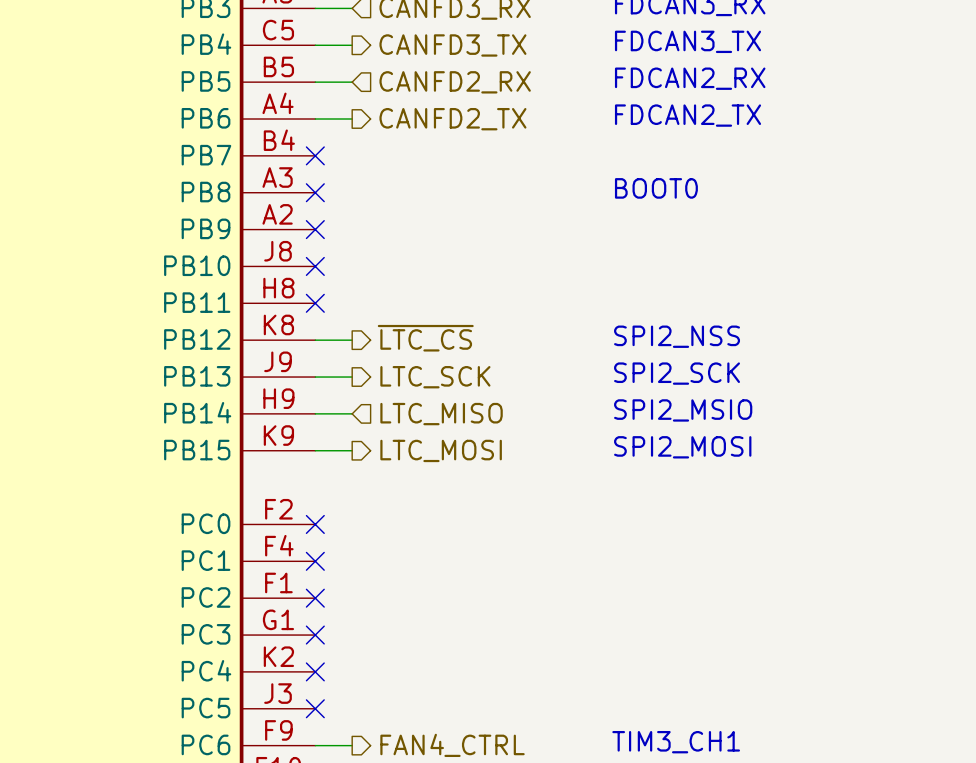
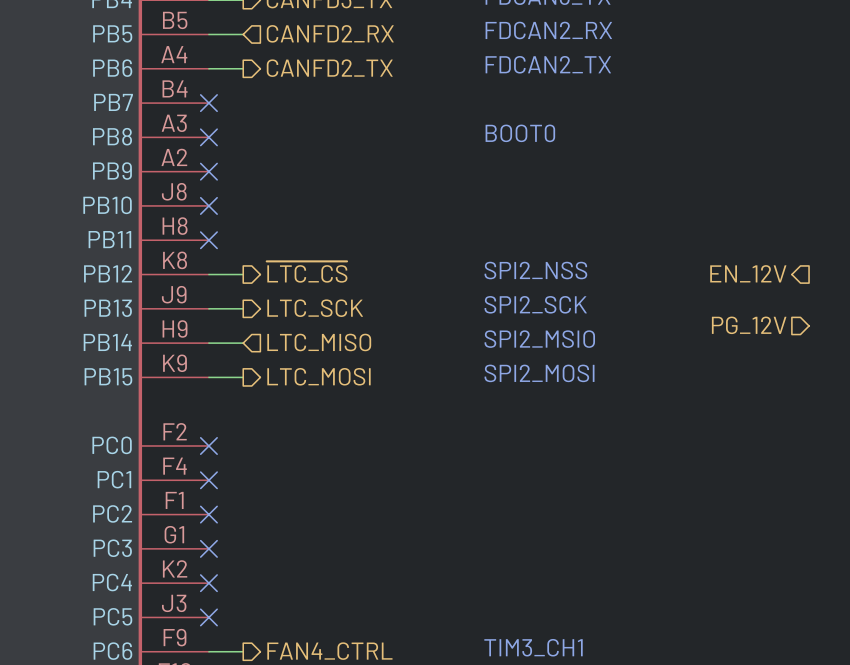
hierarchical label: none -> EN_12V (748, 273)
hierarchical label: none -> PG_12V (749, 325)

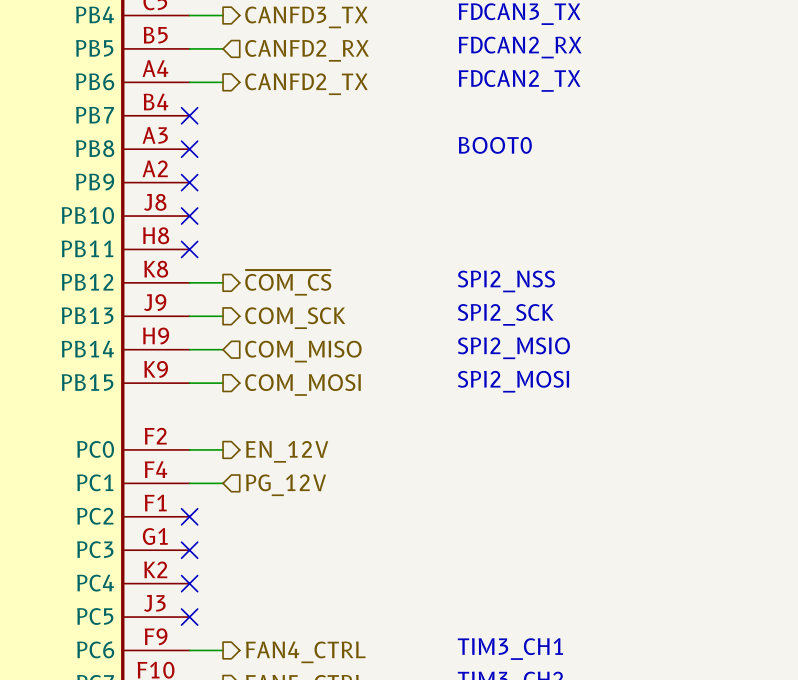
hierarchical label: ~{LTC_CS} (307, 272) -> ~{COM_CS} (288, 282)
hierarchical label: EN_12V (748, 273) -> none
hierarchical label: LTC_SCK (315, 308) -> COM_SCK (295, 318)
hierarchical label: PG_12V (749, 325) -> none
hierarchical label: LTC_MISO (319, 342) -> COM_MISO (303, 351)
hierarchical label: LTC_MOSI (318, 376) -> COM_MOSI (303, 384)
wire: none -> (189, 449) (223, 449)
no-connect mark: (208, 445) -> none
hierarchical label: none -> EN_12V (287, 451)
hierarchical label: none -> PG_12V (286, 485)
wire: none -> (189, 483) (223, 483)
no-connect mark: (208, 480) -> none

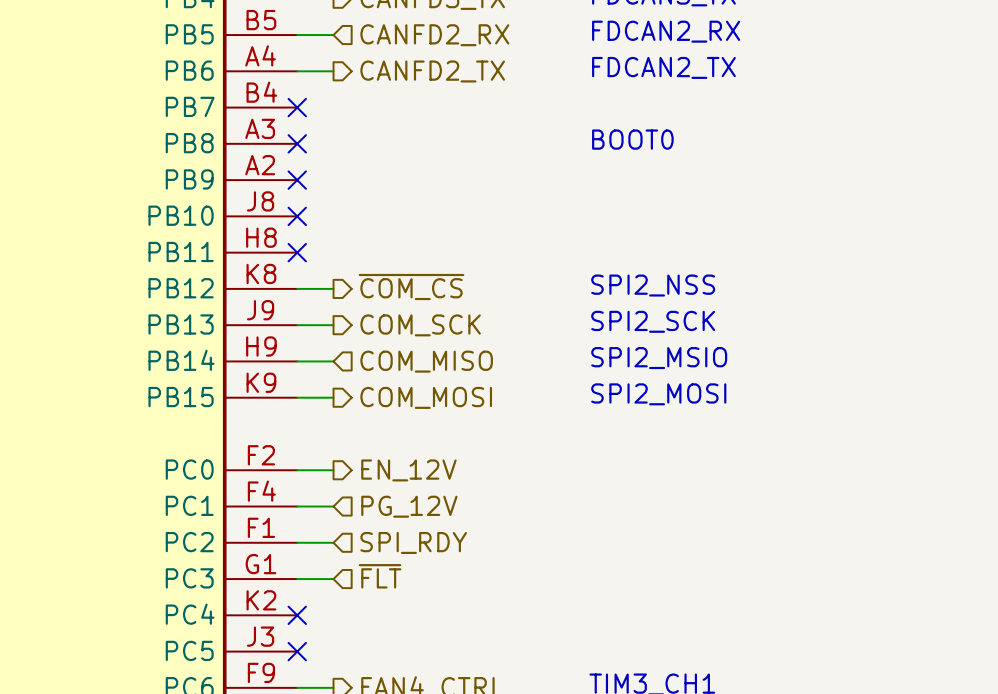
wire: none -> (297, 542) (333, 542)
no-connect mark: (189, 516) -> none
hierarchical label: none -> SPI_RDY (413, 542)
hierarchical label: none -> ~{FLT} (380, 576)
wire: none -> (297, 579) (333, 579)
no-connect mark: (189, 550) -> none

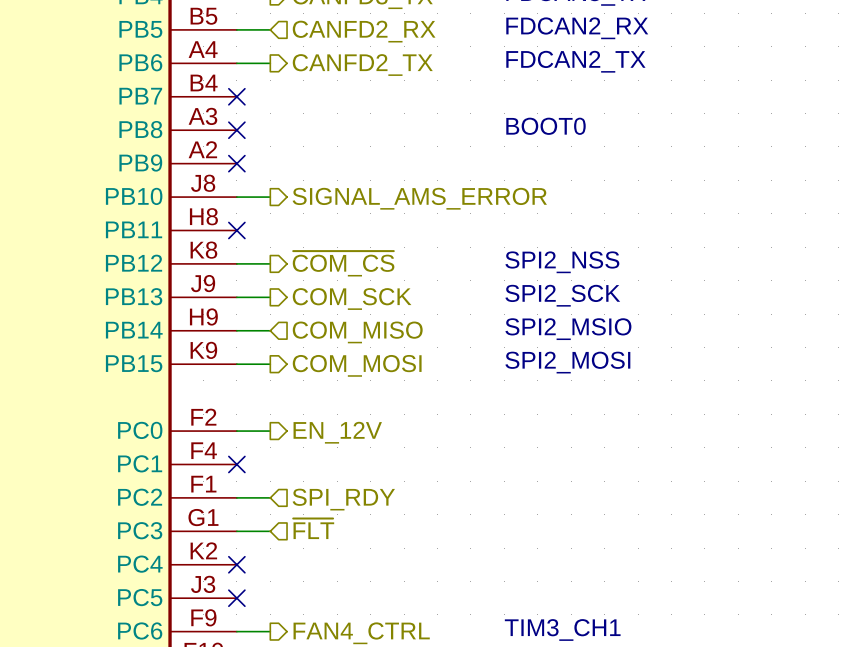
no-connect mark: (297, 216) -> none
hierarchical label: none -> SIGNAL_AMS_ERROR (419, 198)
wire: (297, 506) (333, 506) -> (236, 197) (270, 197)
no-connect mark: none -> (236, 464)
hierarchical label: PG_12V (409, 506) -> none

